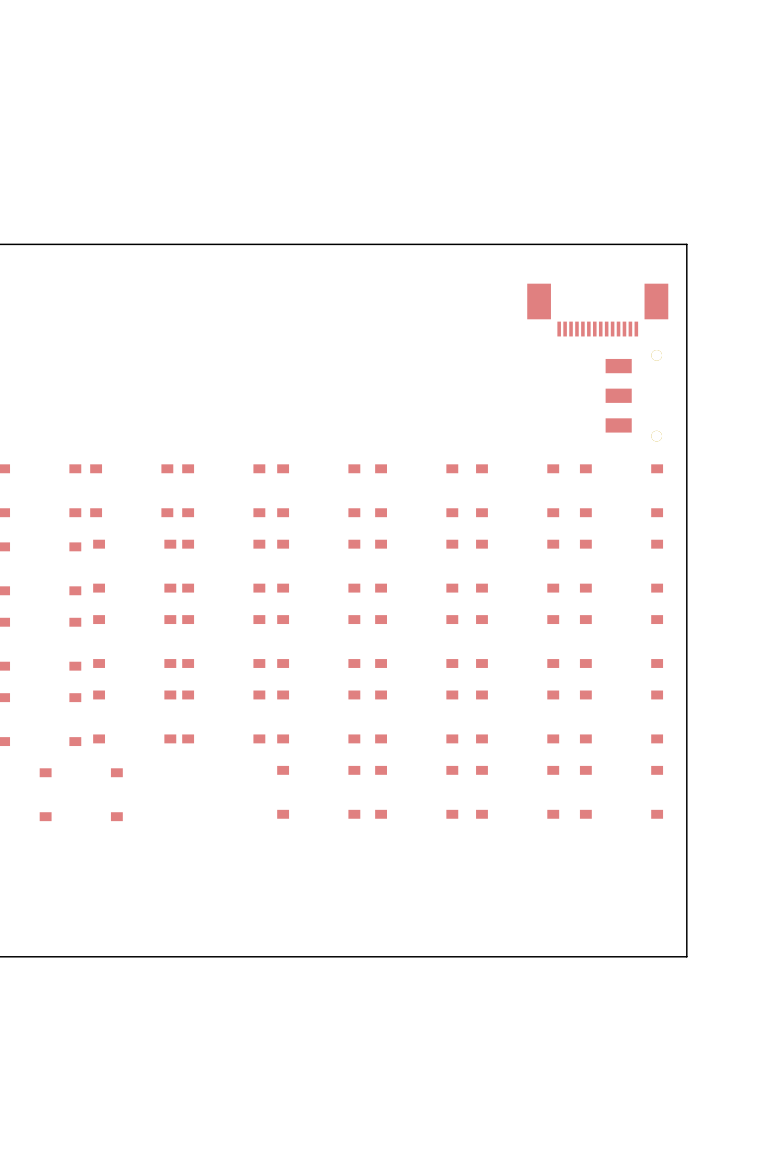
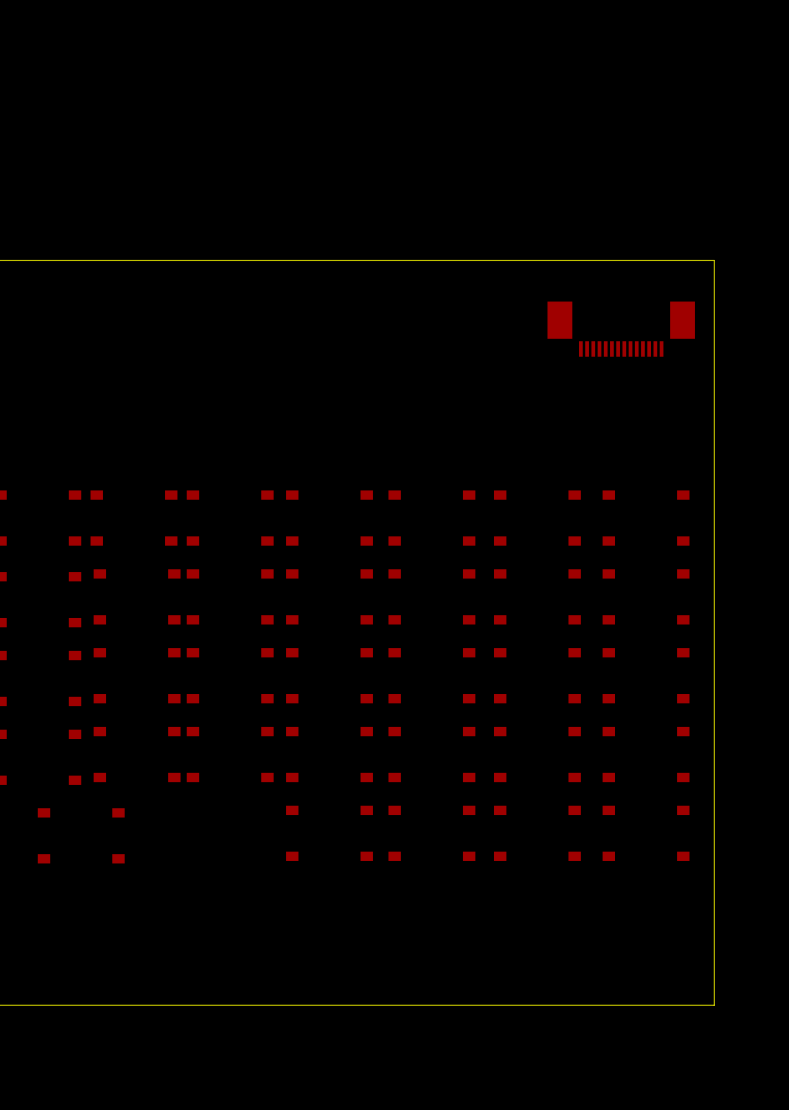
part: (633, 395) -> none

